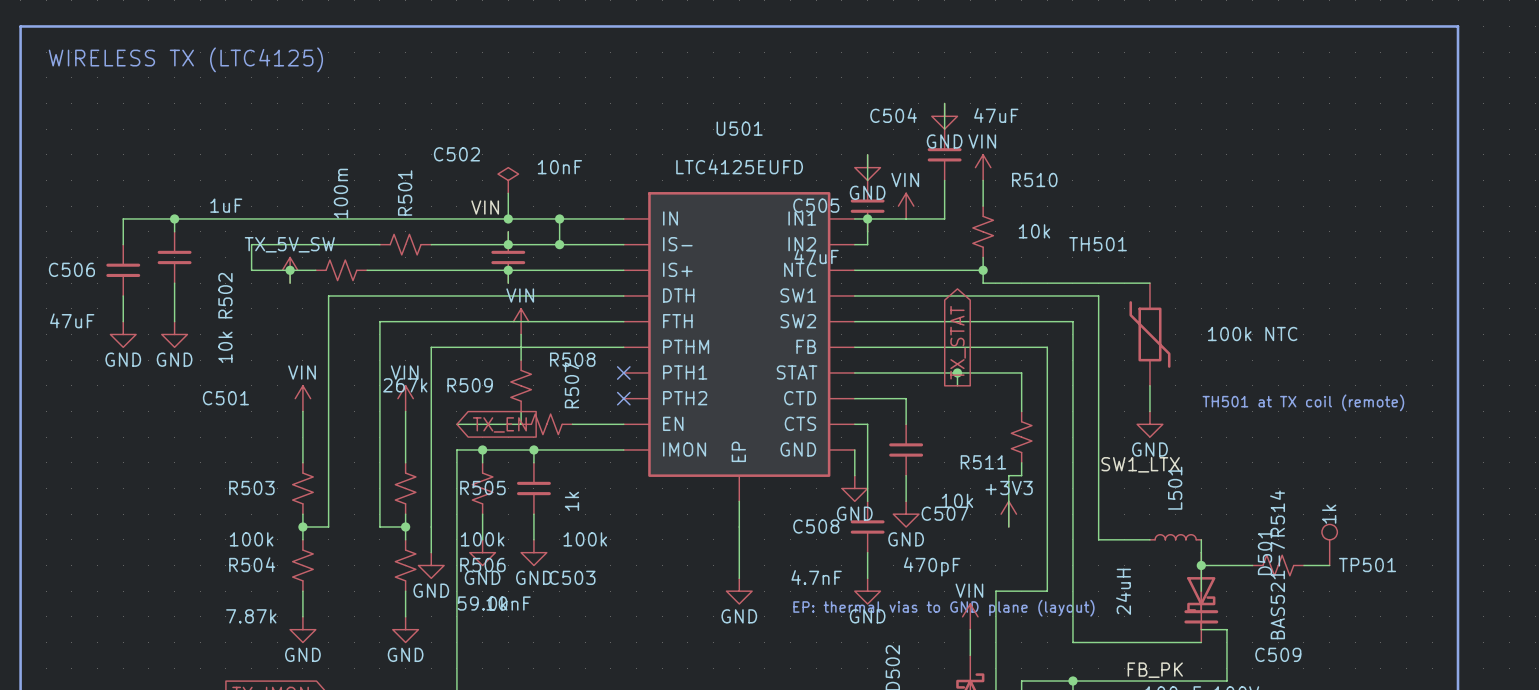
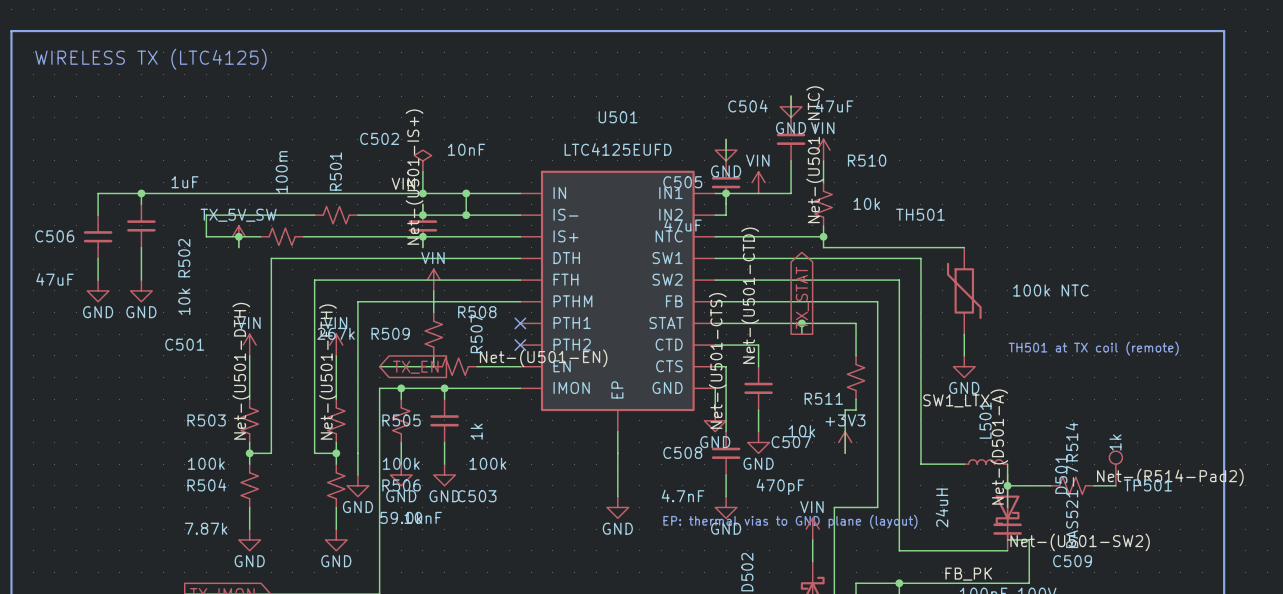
label: none -> Net-(U501-NTC) (815, 154)
label: none -> Net-(U501-IS+) (414, 177)
label: none -> Net-(U501-CTD) (750, 295)
label: none -> Net-(U501-EN) (543, 358)
label: none -> Net-(U501-CTS) (717, 360)
label: none -> Net-(U501-DTH) (241, 371)
label: none -> Net-(U501-FTH) (327, 372)
label: none -> Net-(D501-A) (999, 447)
label: none -> Net-(R514-Pad2) (1170, 477)
label: none -> Net-(U501-SW2) (1080, 542)

